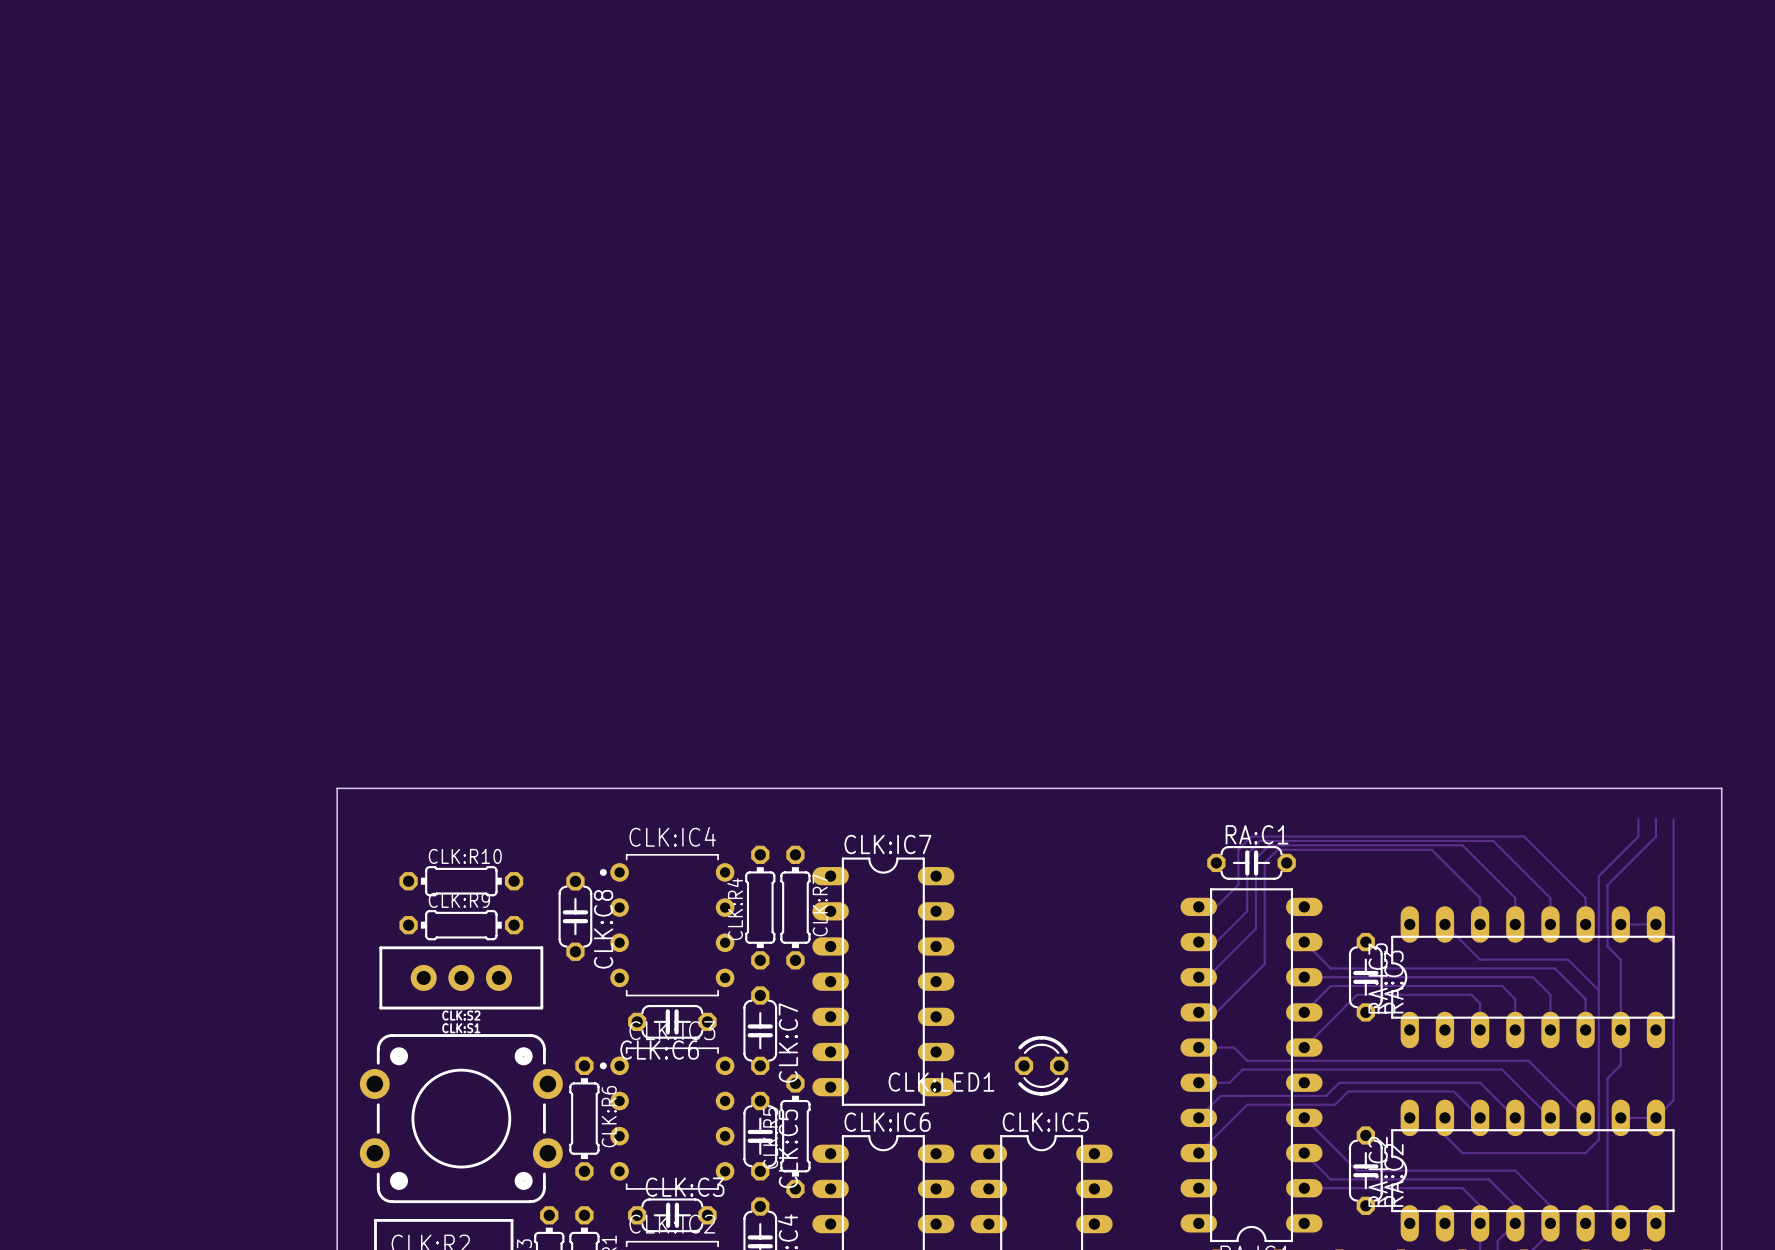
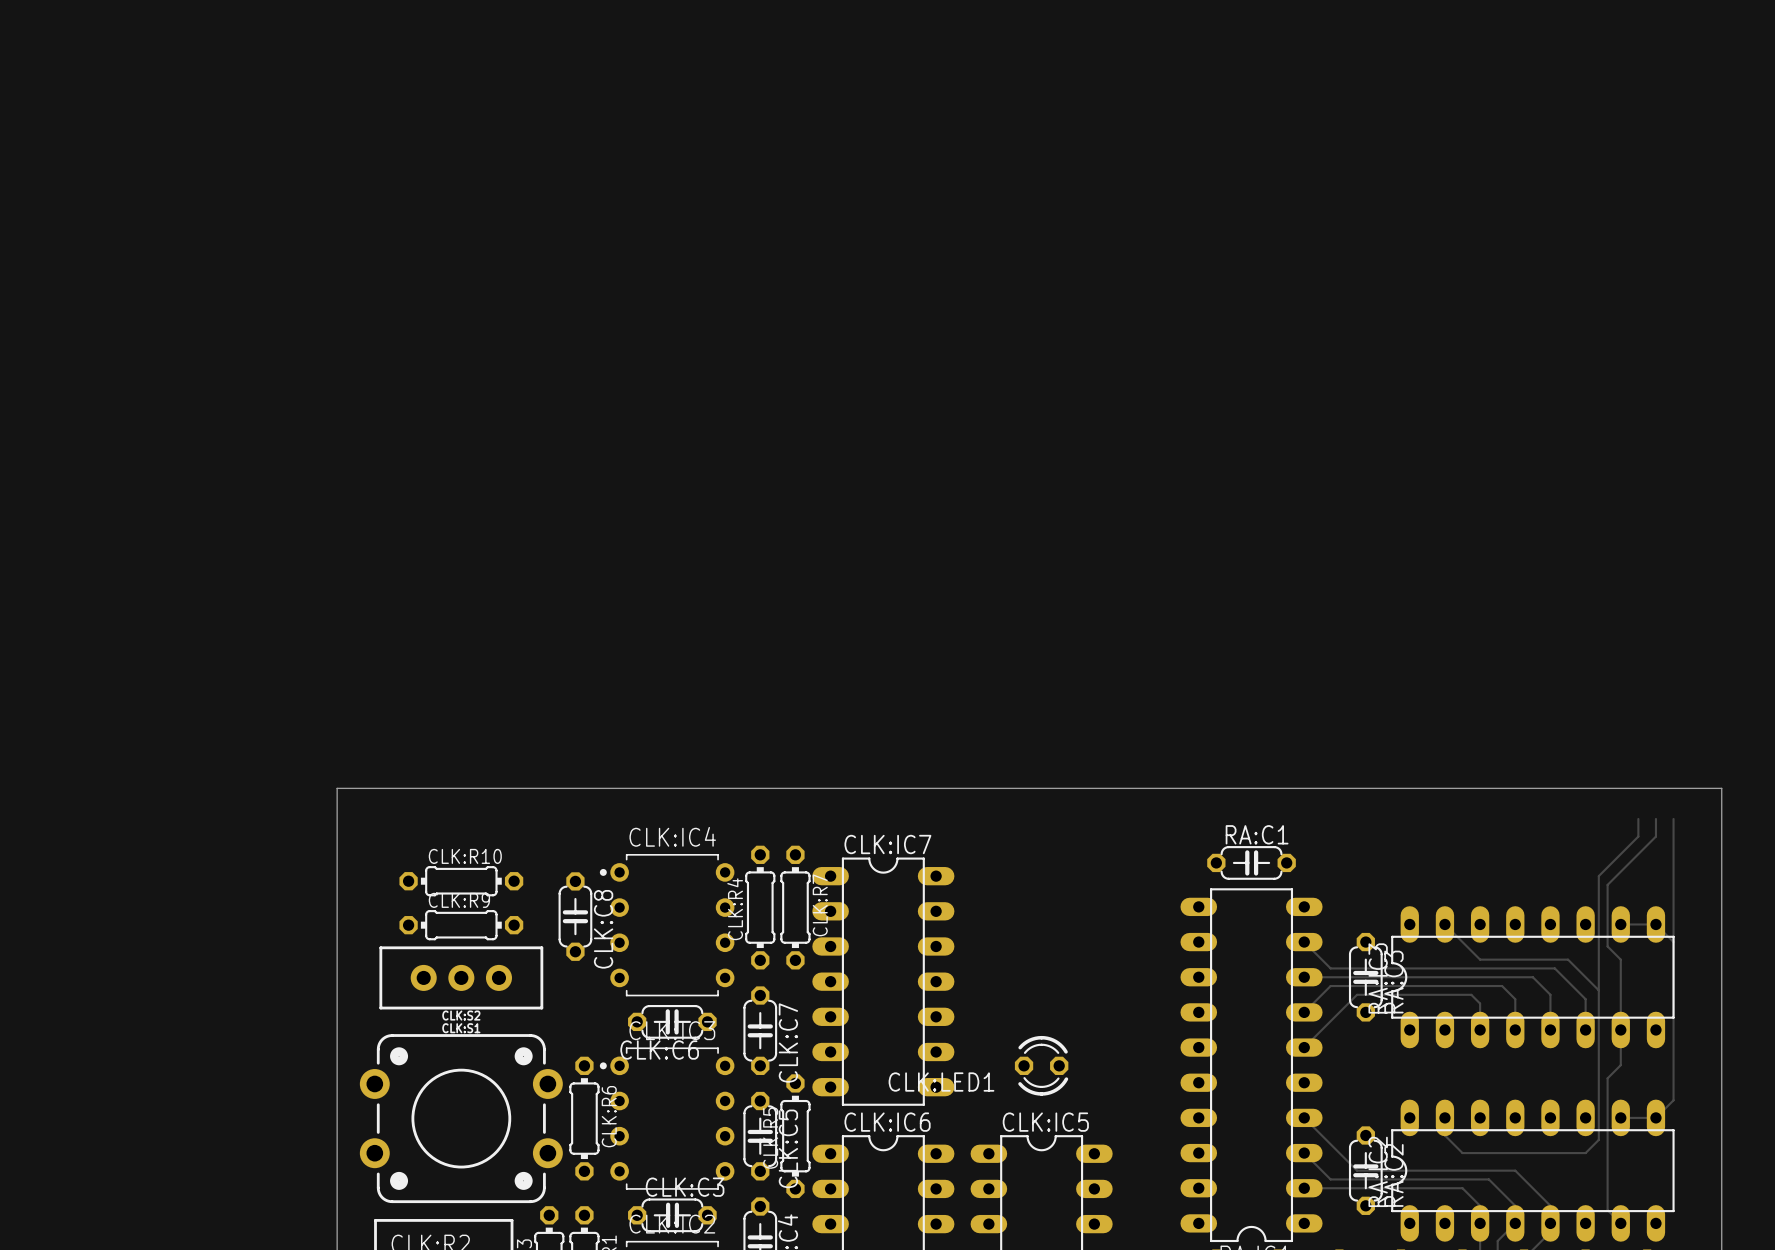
track: (1198, 906) (1216, 906) (1238, 884) (1238, 849) (1251, 836) (1524, 836) (1585, 898) (1585, 924) -> none
track: (1480, 924) (1480, 898) (1431, 849) (1277, 849) (1264, 862) (1264, 964) (1216, 1012) (1198, 1012) -> none
track: (1515, 924) (1515, 898) (1462, 845) (1269, 845) (1255, 858) (1255, 928) (1207, 977) (1198, 977) -> none
track: (1550, 924) (1550, 898) (1493, 840) (1260, 840) (1247, 854) (1247, 911) (1216, 942) (1198, 942) -> none
track: (1198, 1047) (1233, 1047) (1247, 1060) (1528, 1060) (1585, 1117) -> none
track: (1198, 1082) (1229, 1082) (1242, 1069) (1502, 1069) (1550, 1117) -> none
track: (1198, 1117) (1220, 1095) (1326, 1095) (1339, 1082) (1480, 1082) (1515, 1117) -> none
track: (1480, 1117) (1453, 1091) (1348, 1091) (1335, 1104) (1247, 1104) (1198, 1153) -> none

